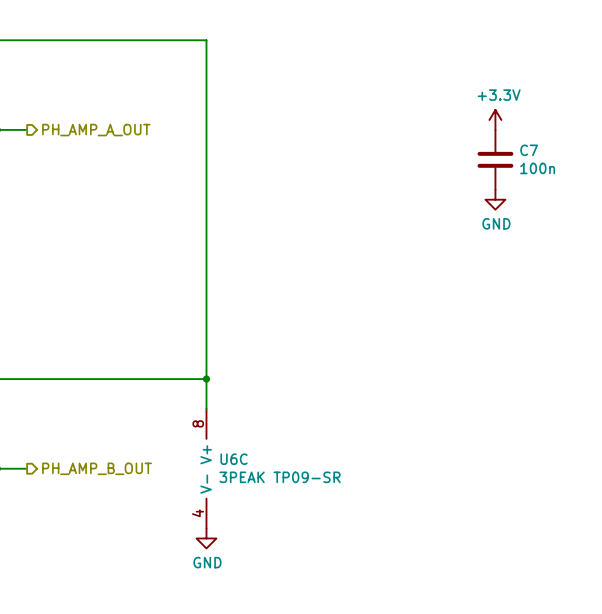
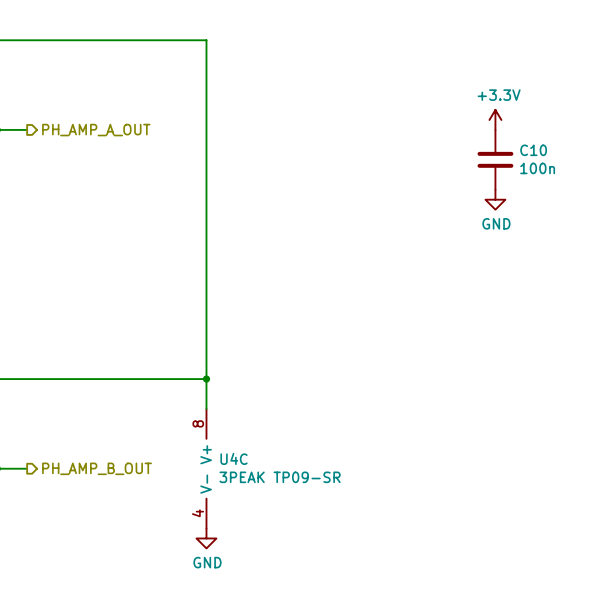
C7 name: C7 (529, 150) -> C10 (533, 150)
U6C name: U6C (234, 459) -> U4C (234, 458)

